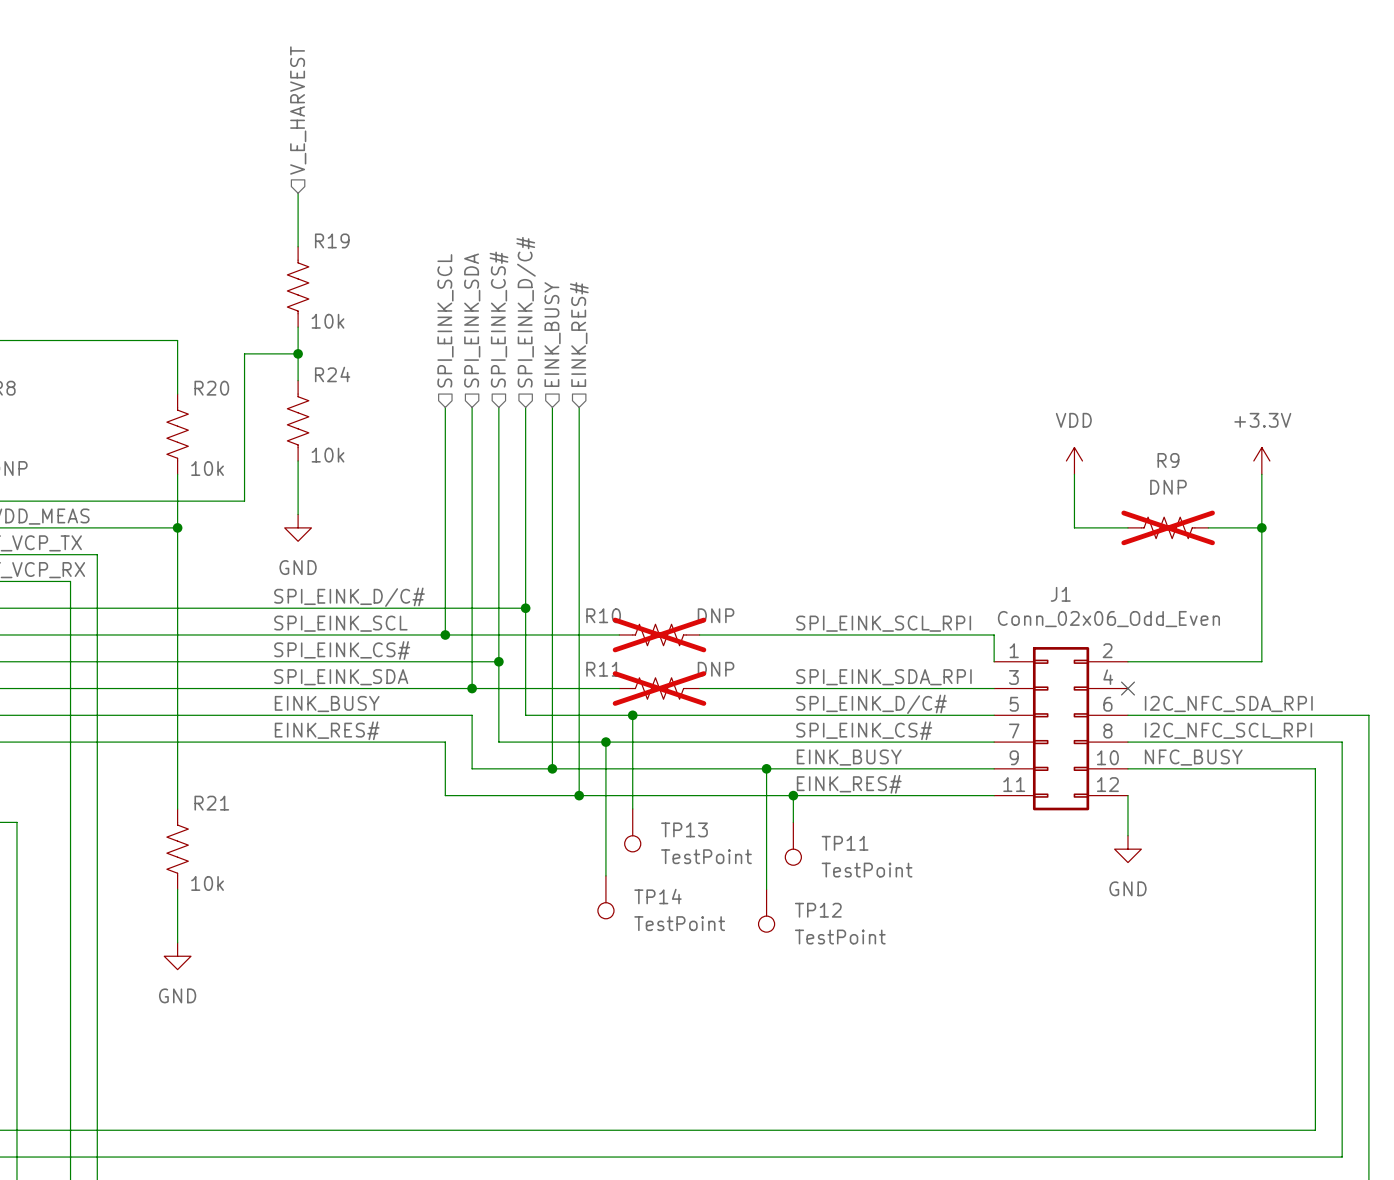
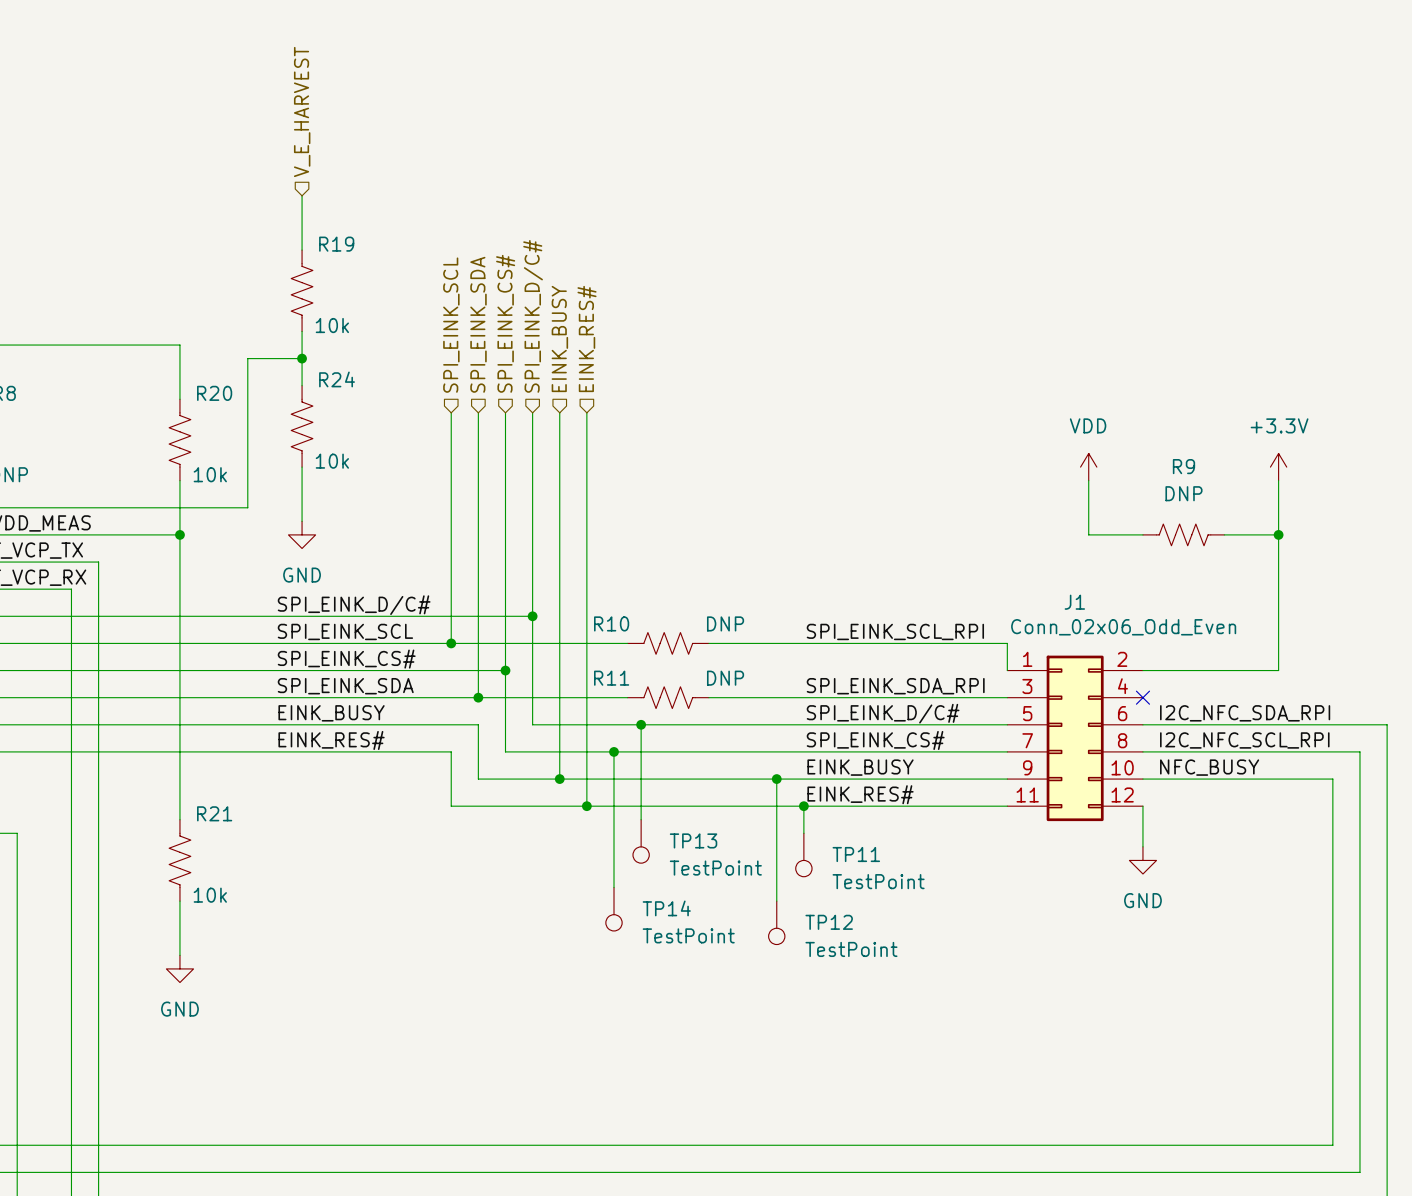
R9 do-not-place cross: (1168, 527) -> none
R10 do-not-place cross: (659, 634) -> none
R11 do-not-place cross: (659, 688) -> none

